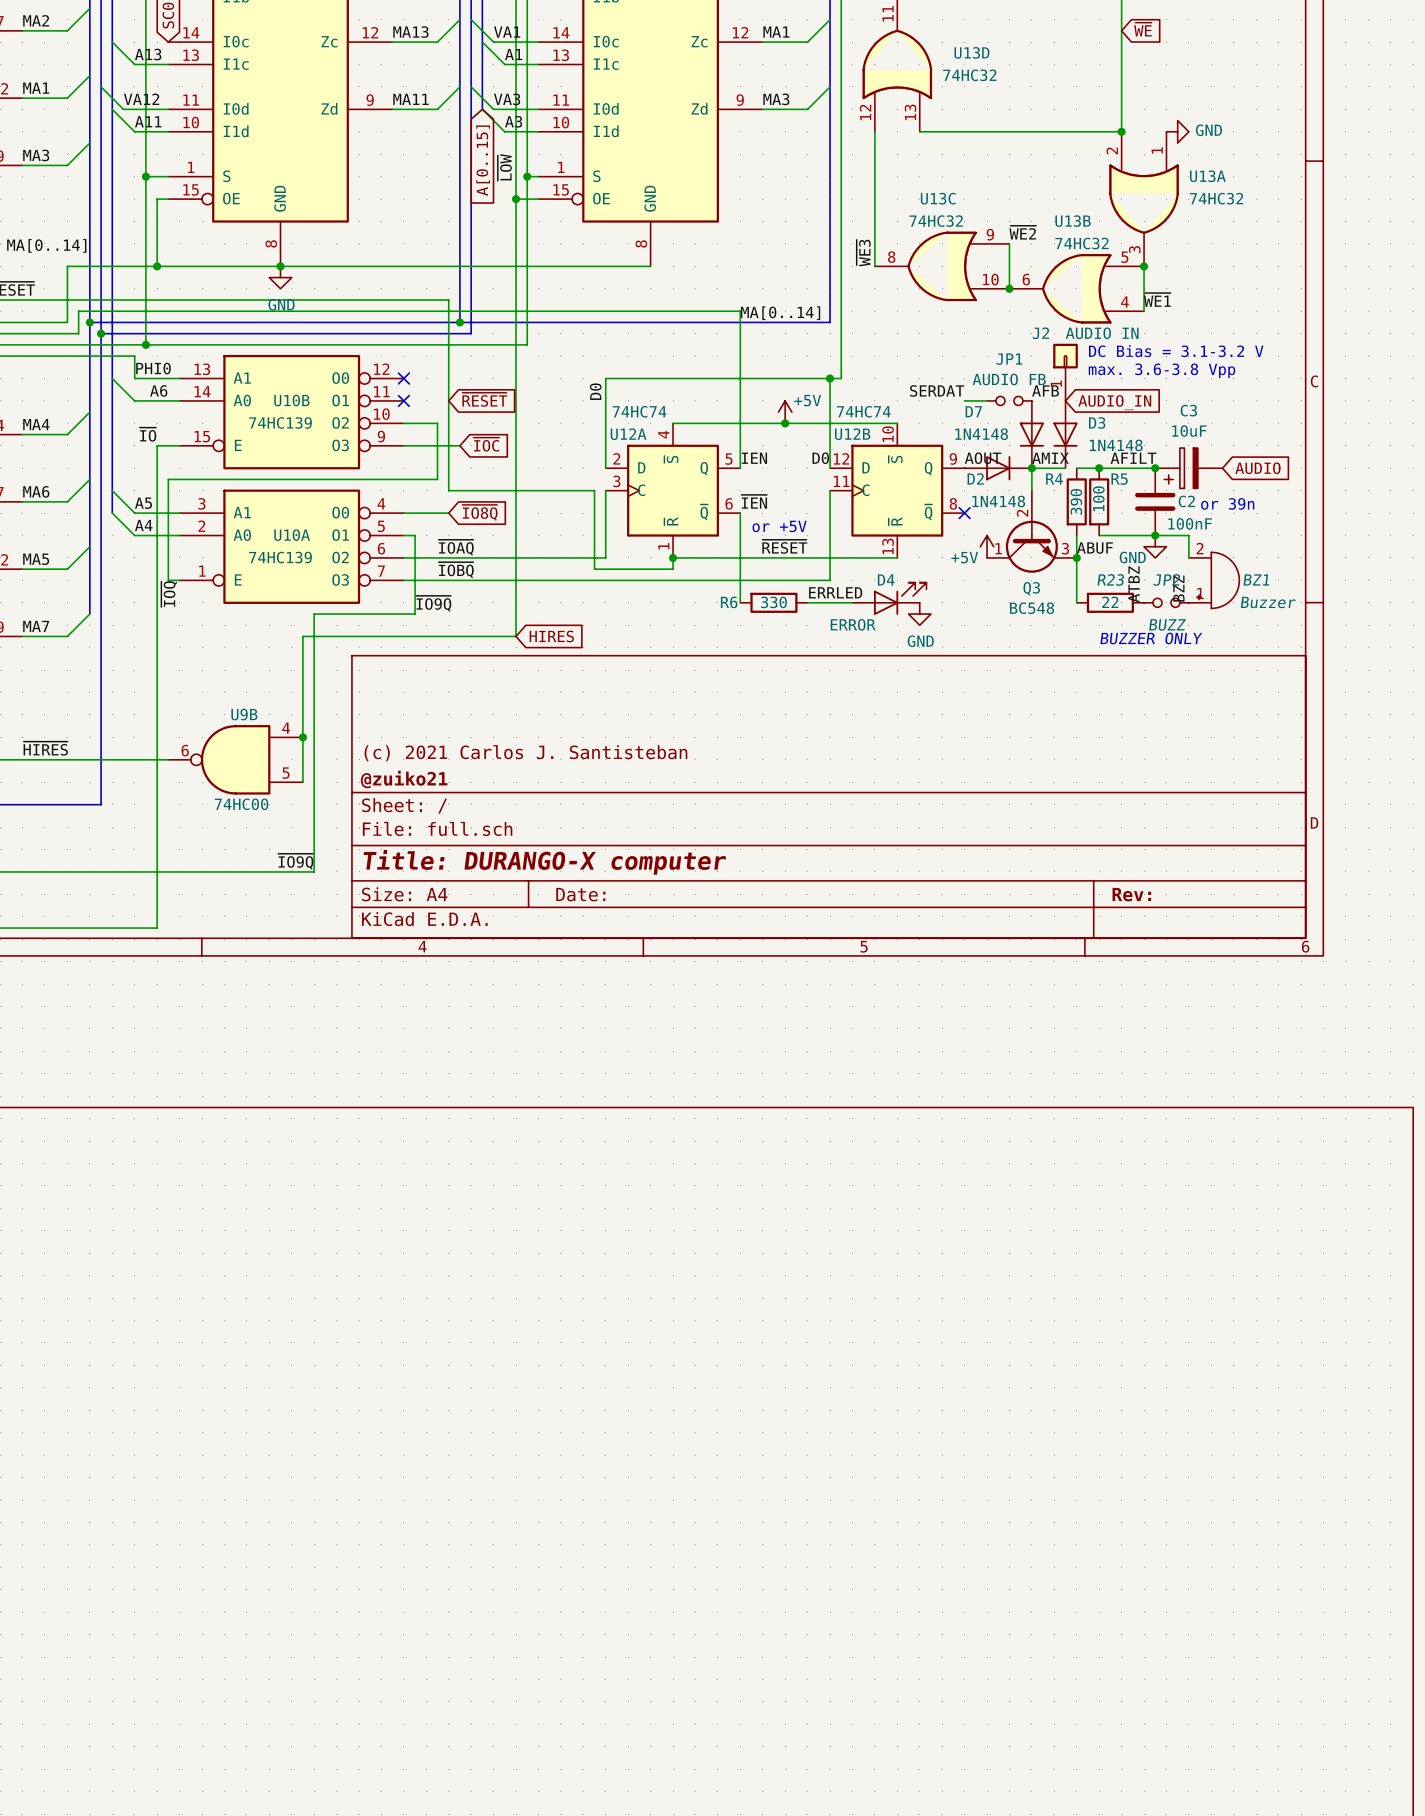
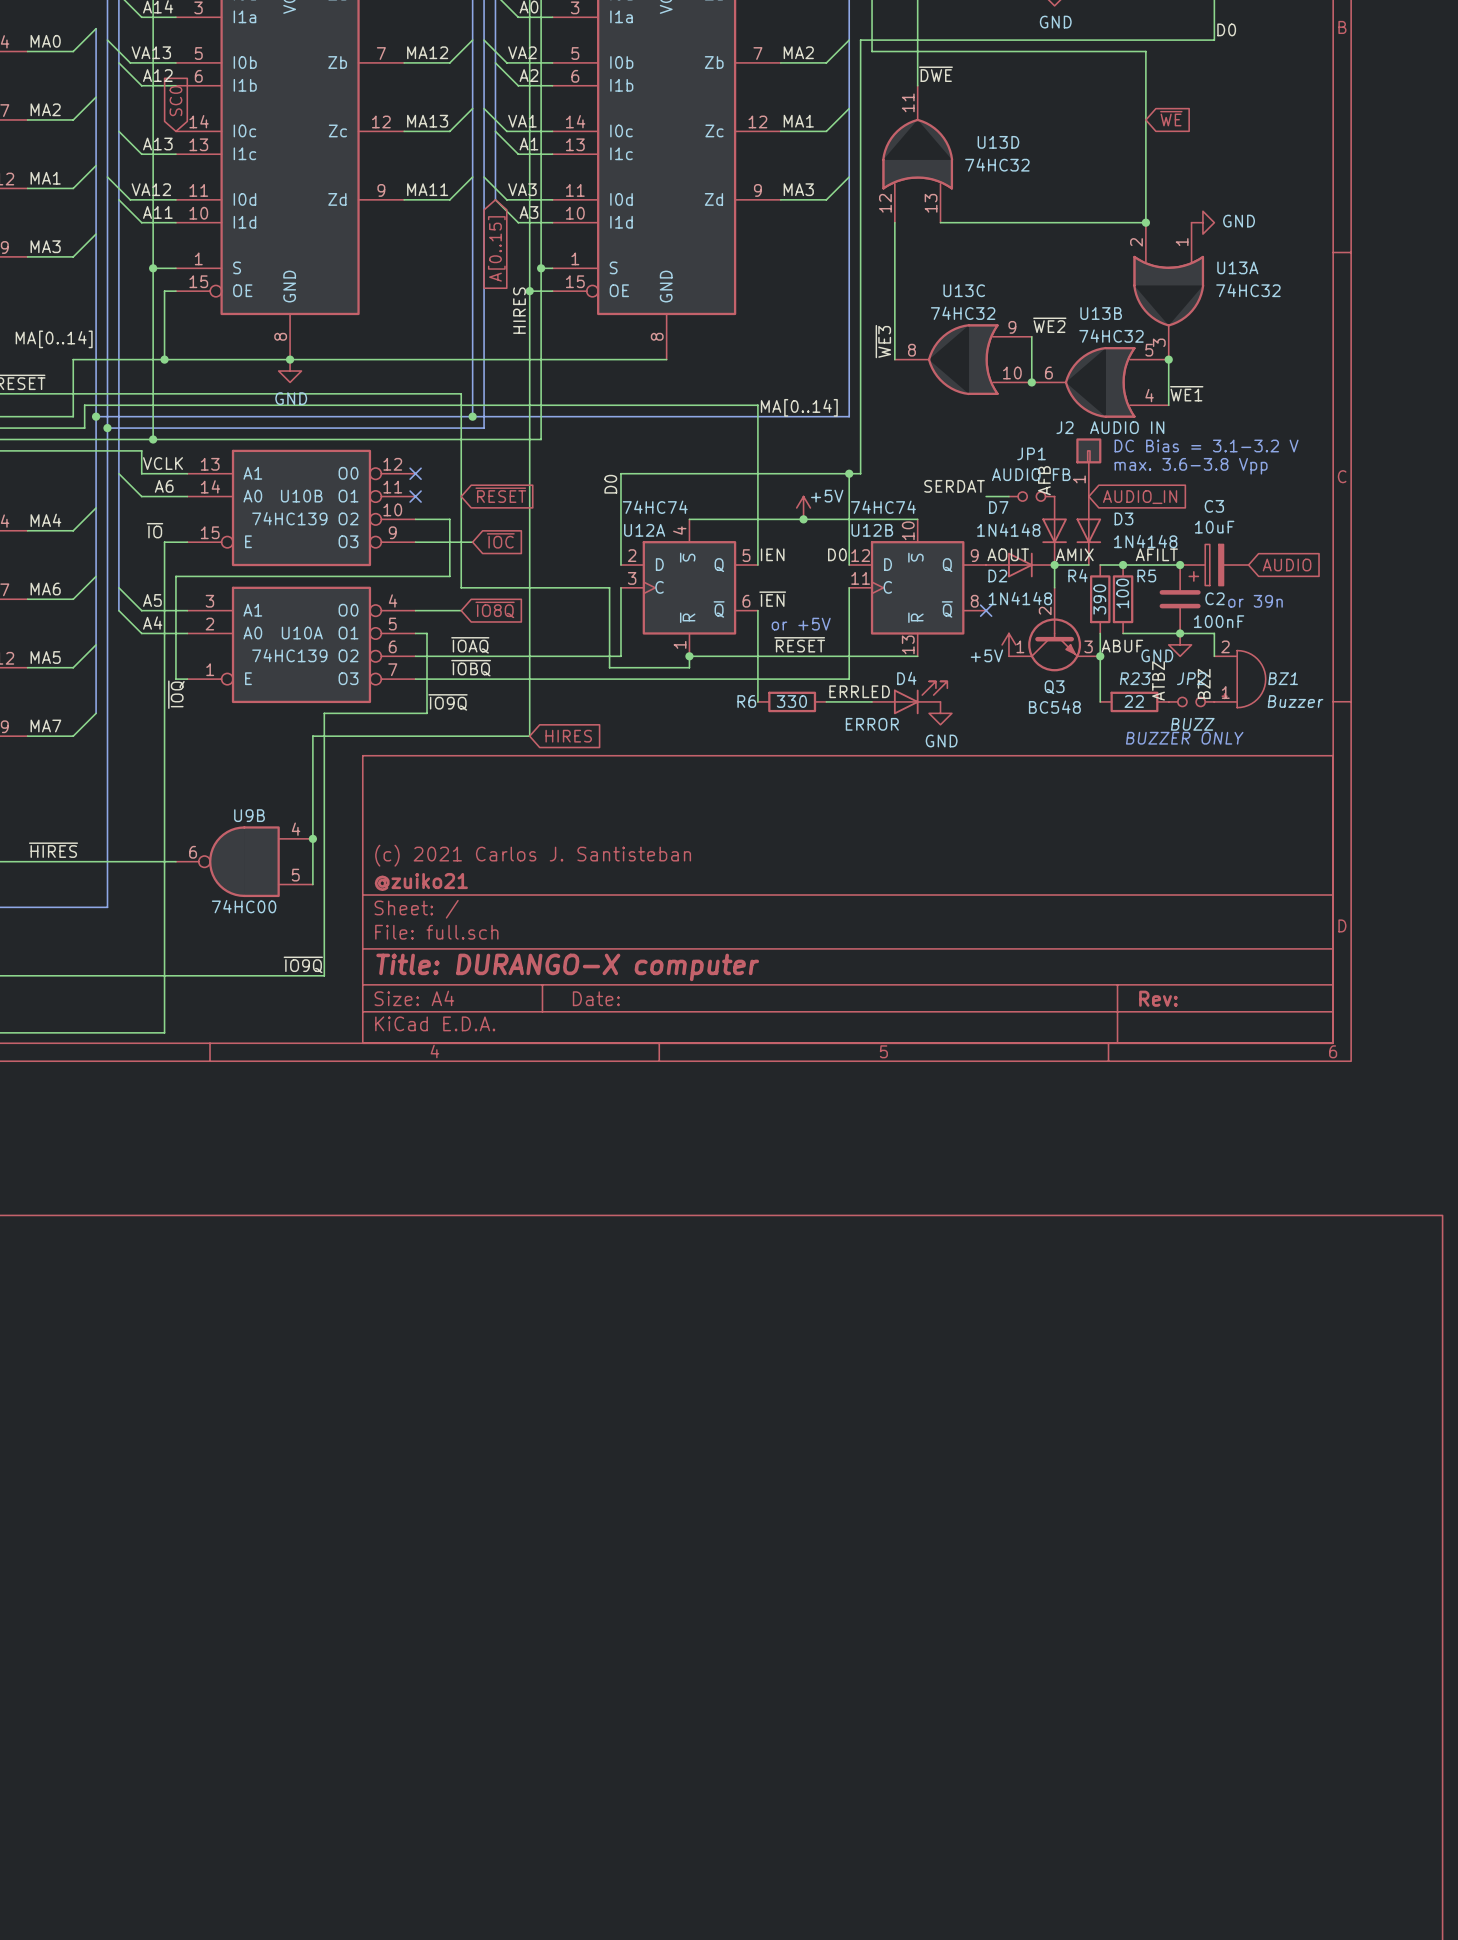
label: ~{LOW} (504, 167) -> none
label: none -> HIRES (519, 310)
label: PHI0 (153, 368) -> VCLK (163, 463)
label rotation: 0° (1045, 390) -> 90° counterclockwise (1044, 480)

